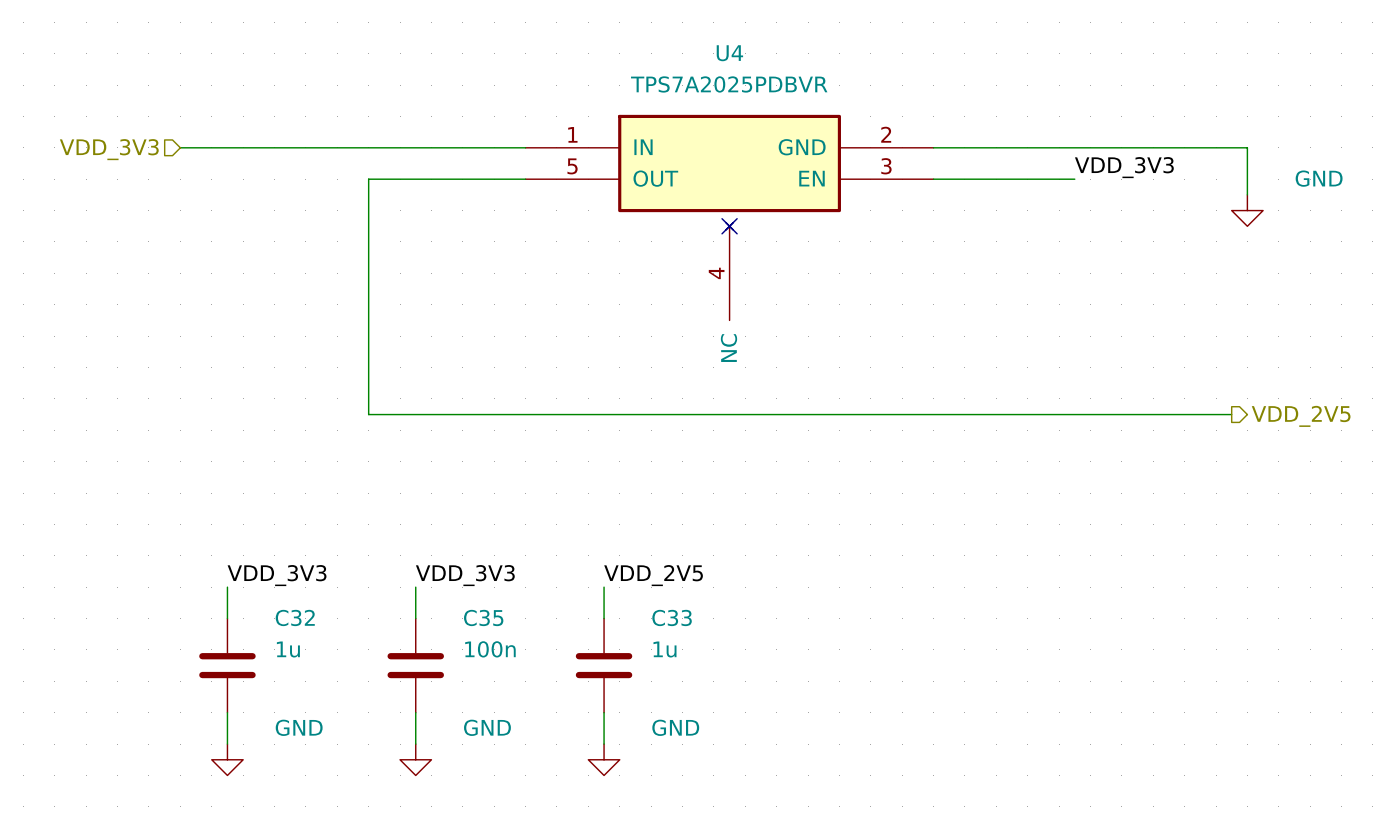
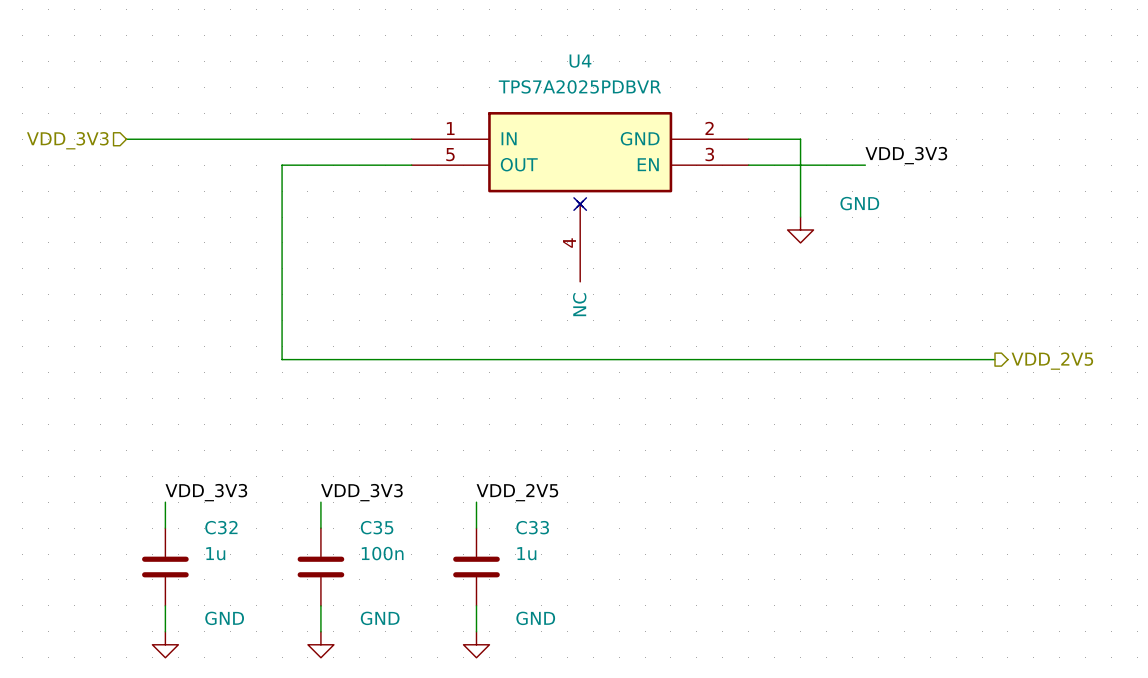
wire: (996, 147) (1247, 147) (1247, 194) -> (800, 139) (800, 217)
power symbol position: GND (1247, 210) -> GND (800, 229)

